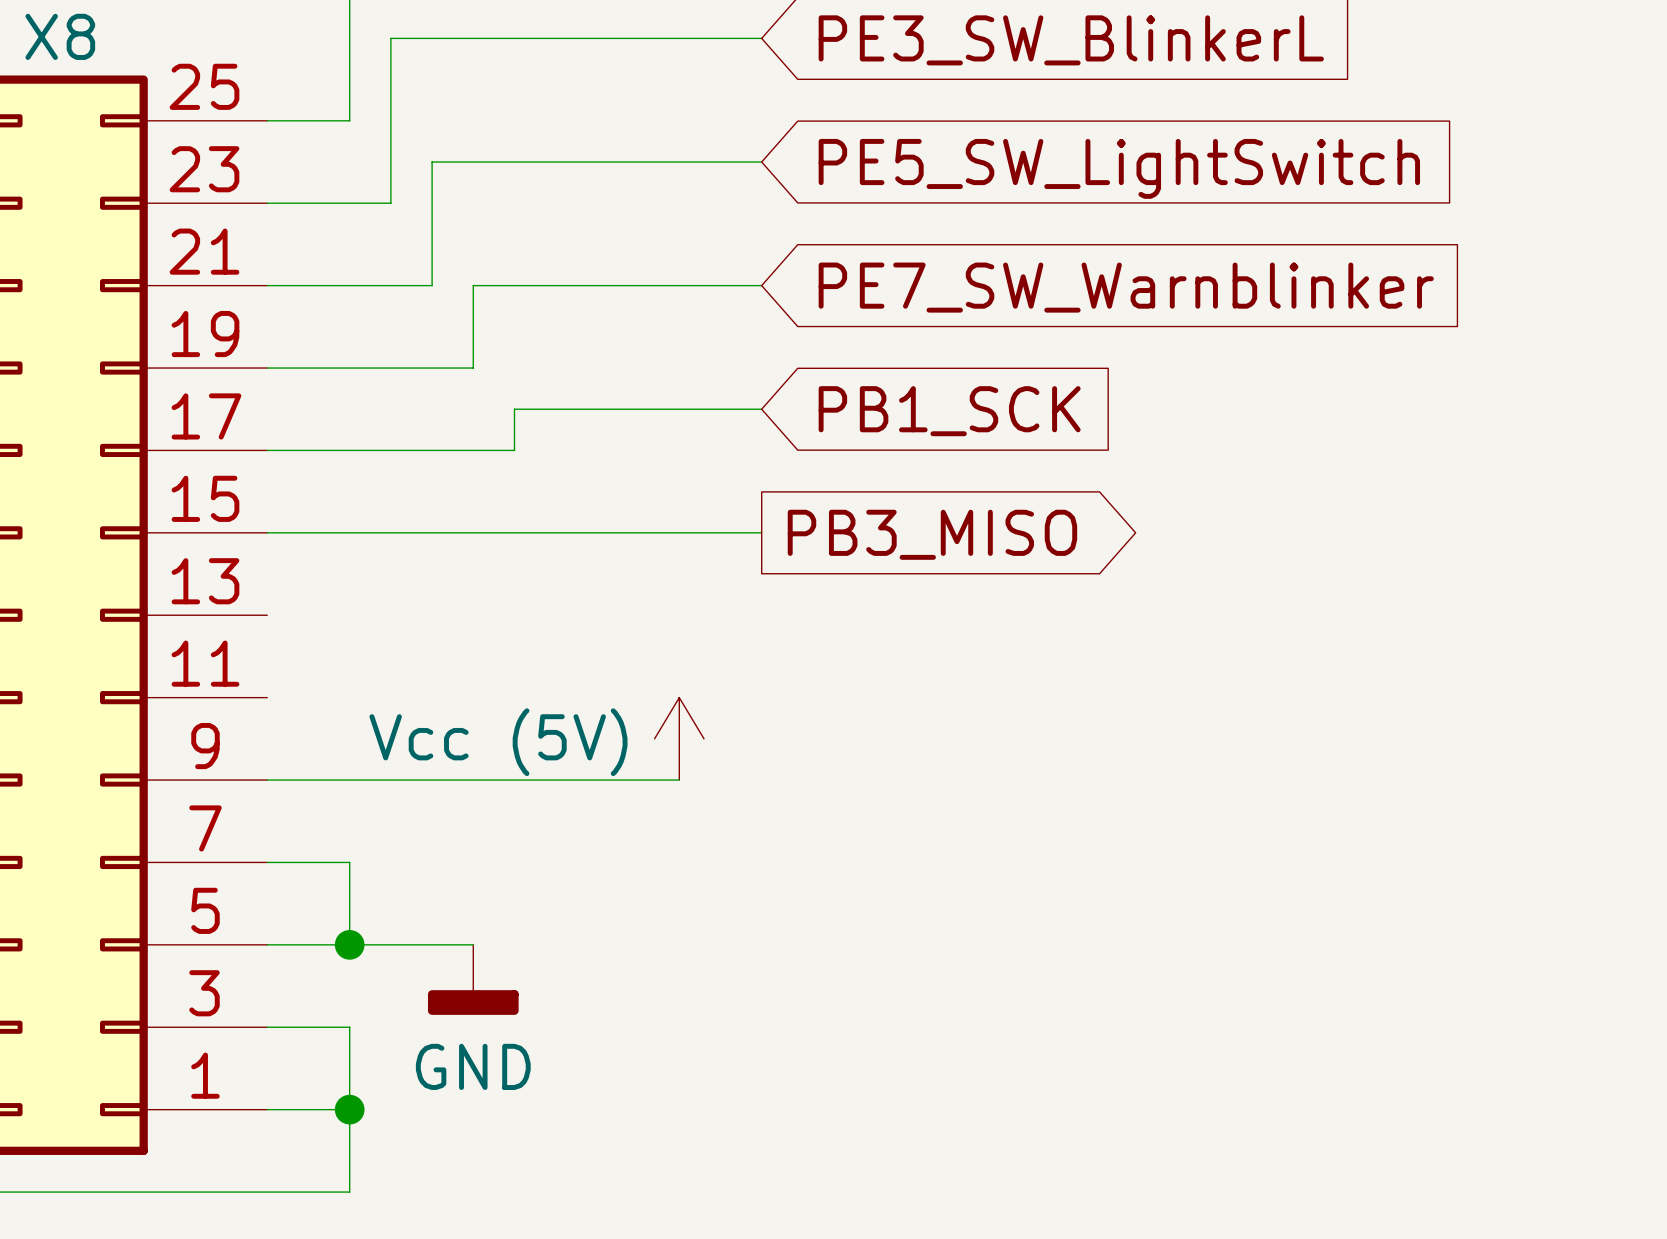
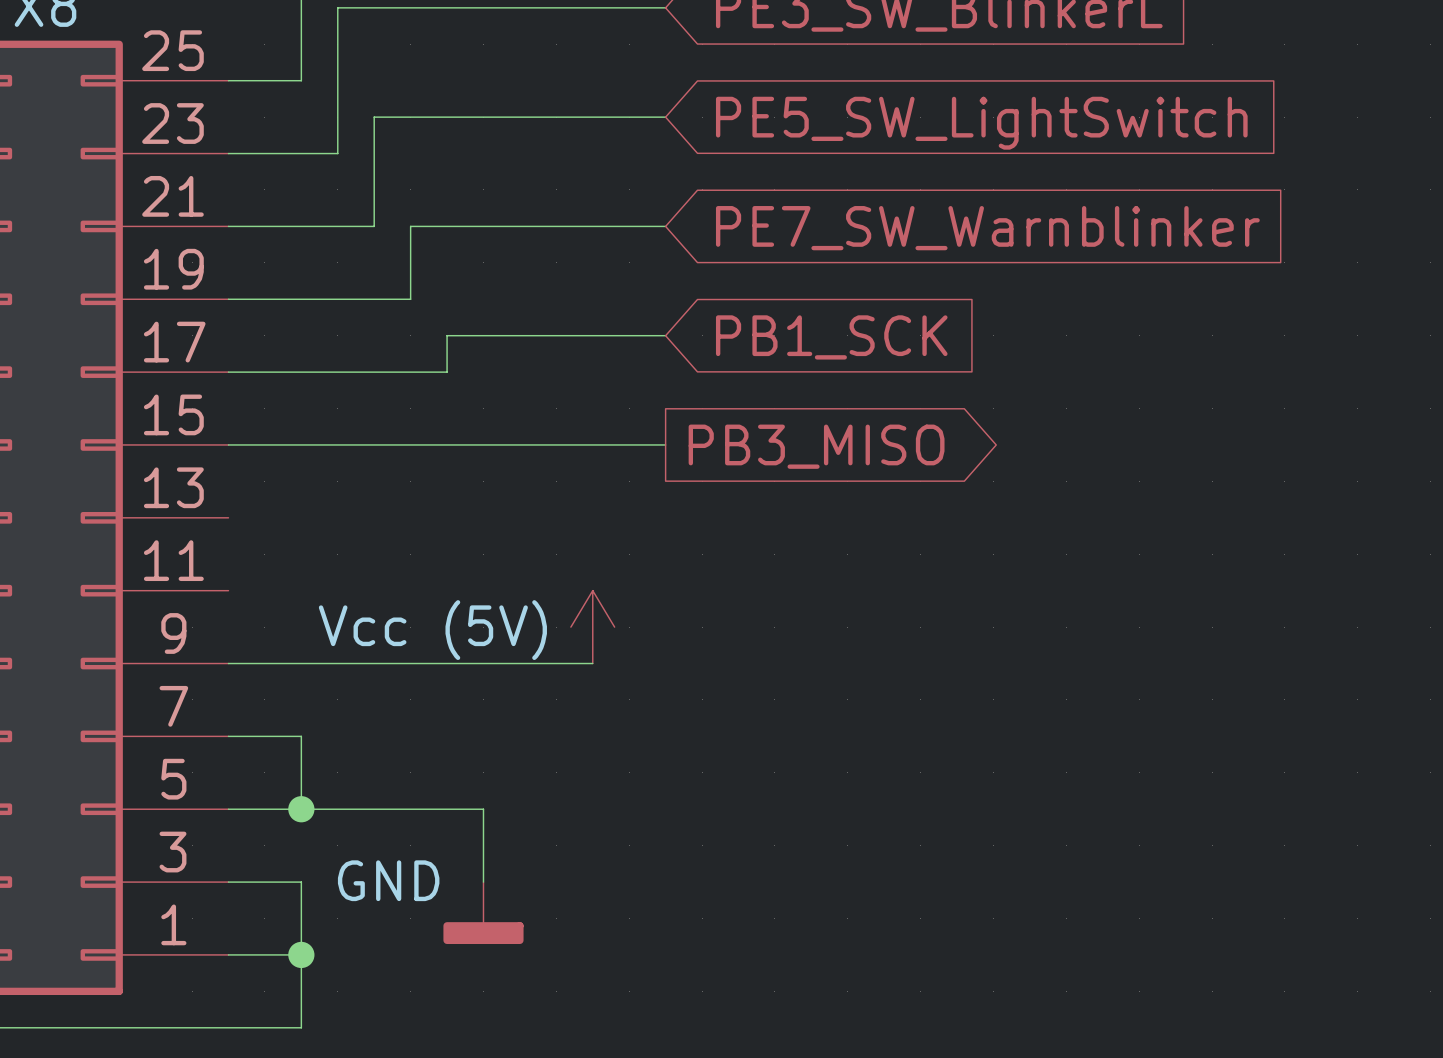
wire: none -> (410, 809) (483, 809) (483, 882)
power symbol position: GND (473, 979) -> GND (483, 913)
power symbol text position: GND (473, 1066) -> GND (388, 880)

